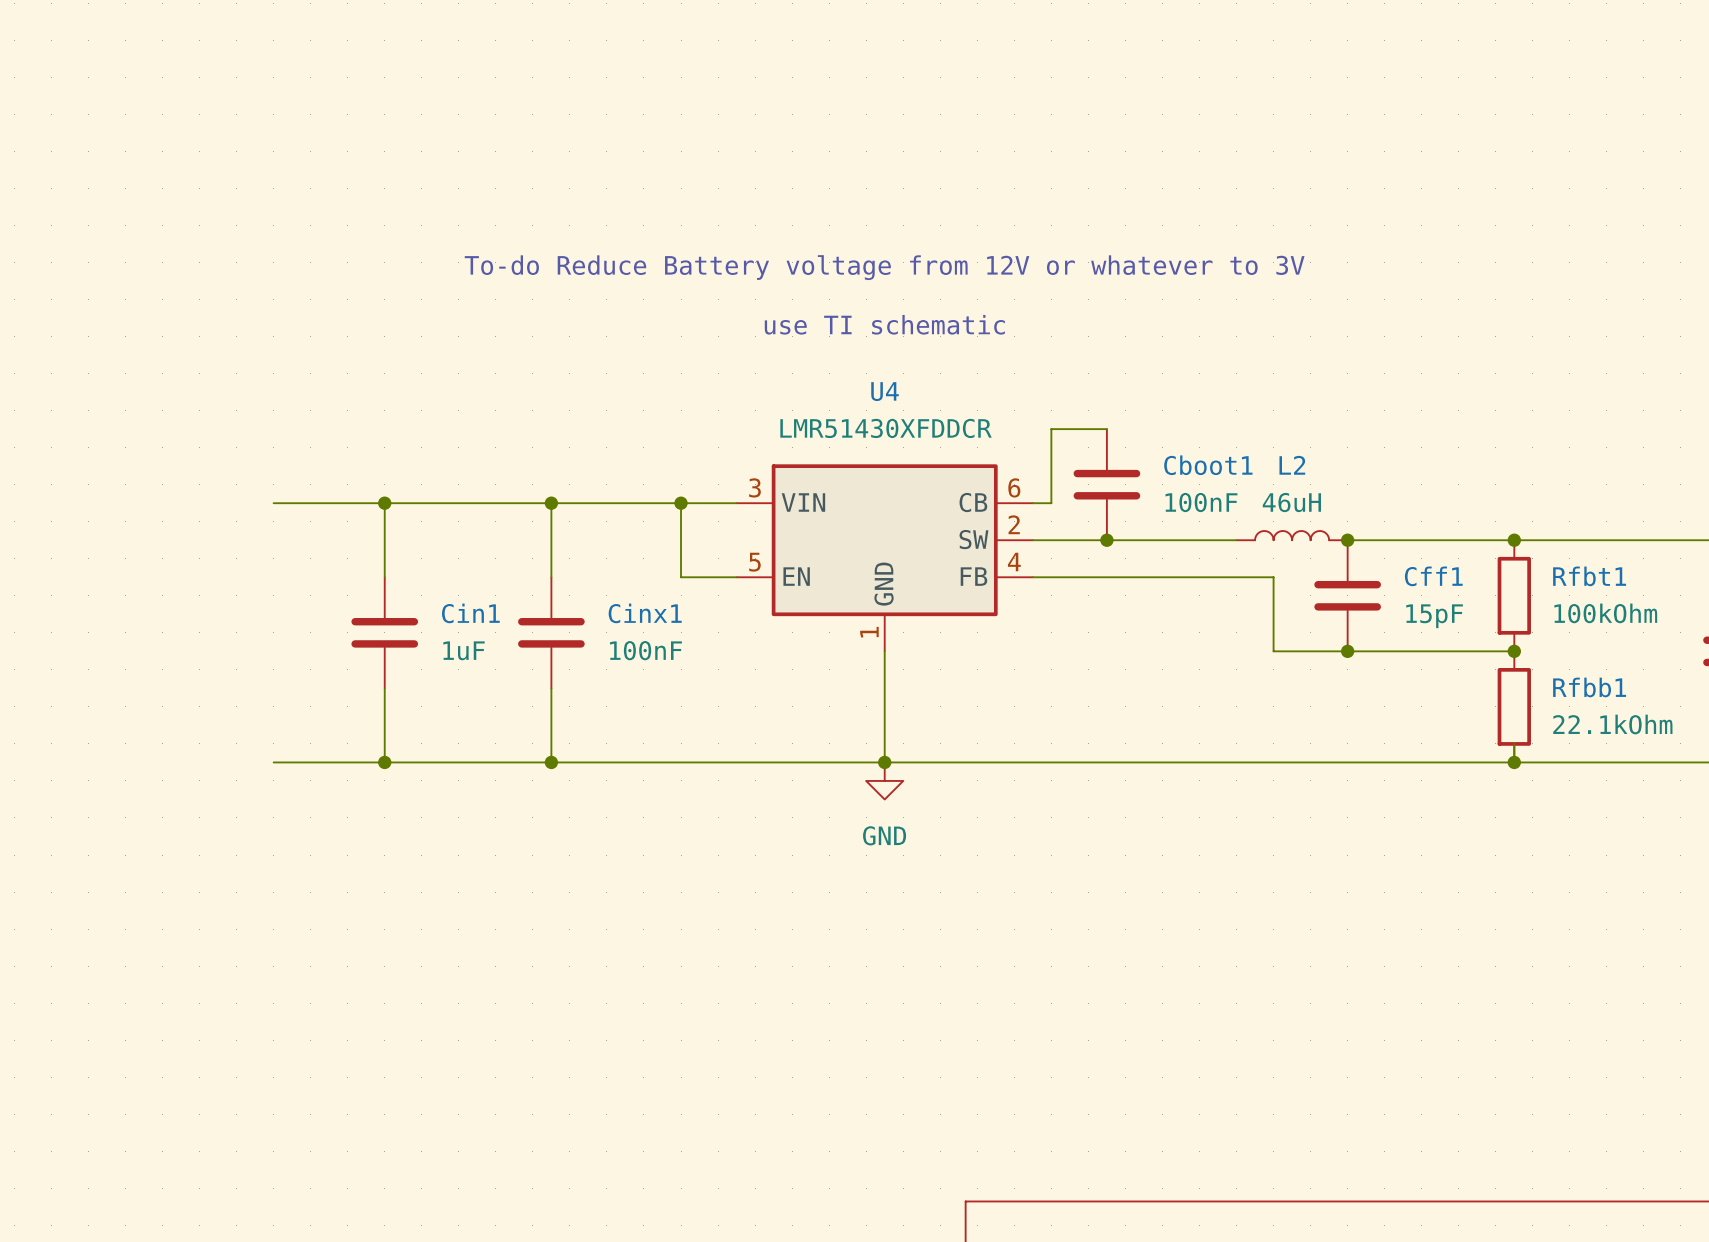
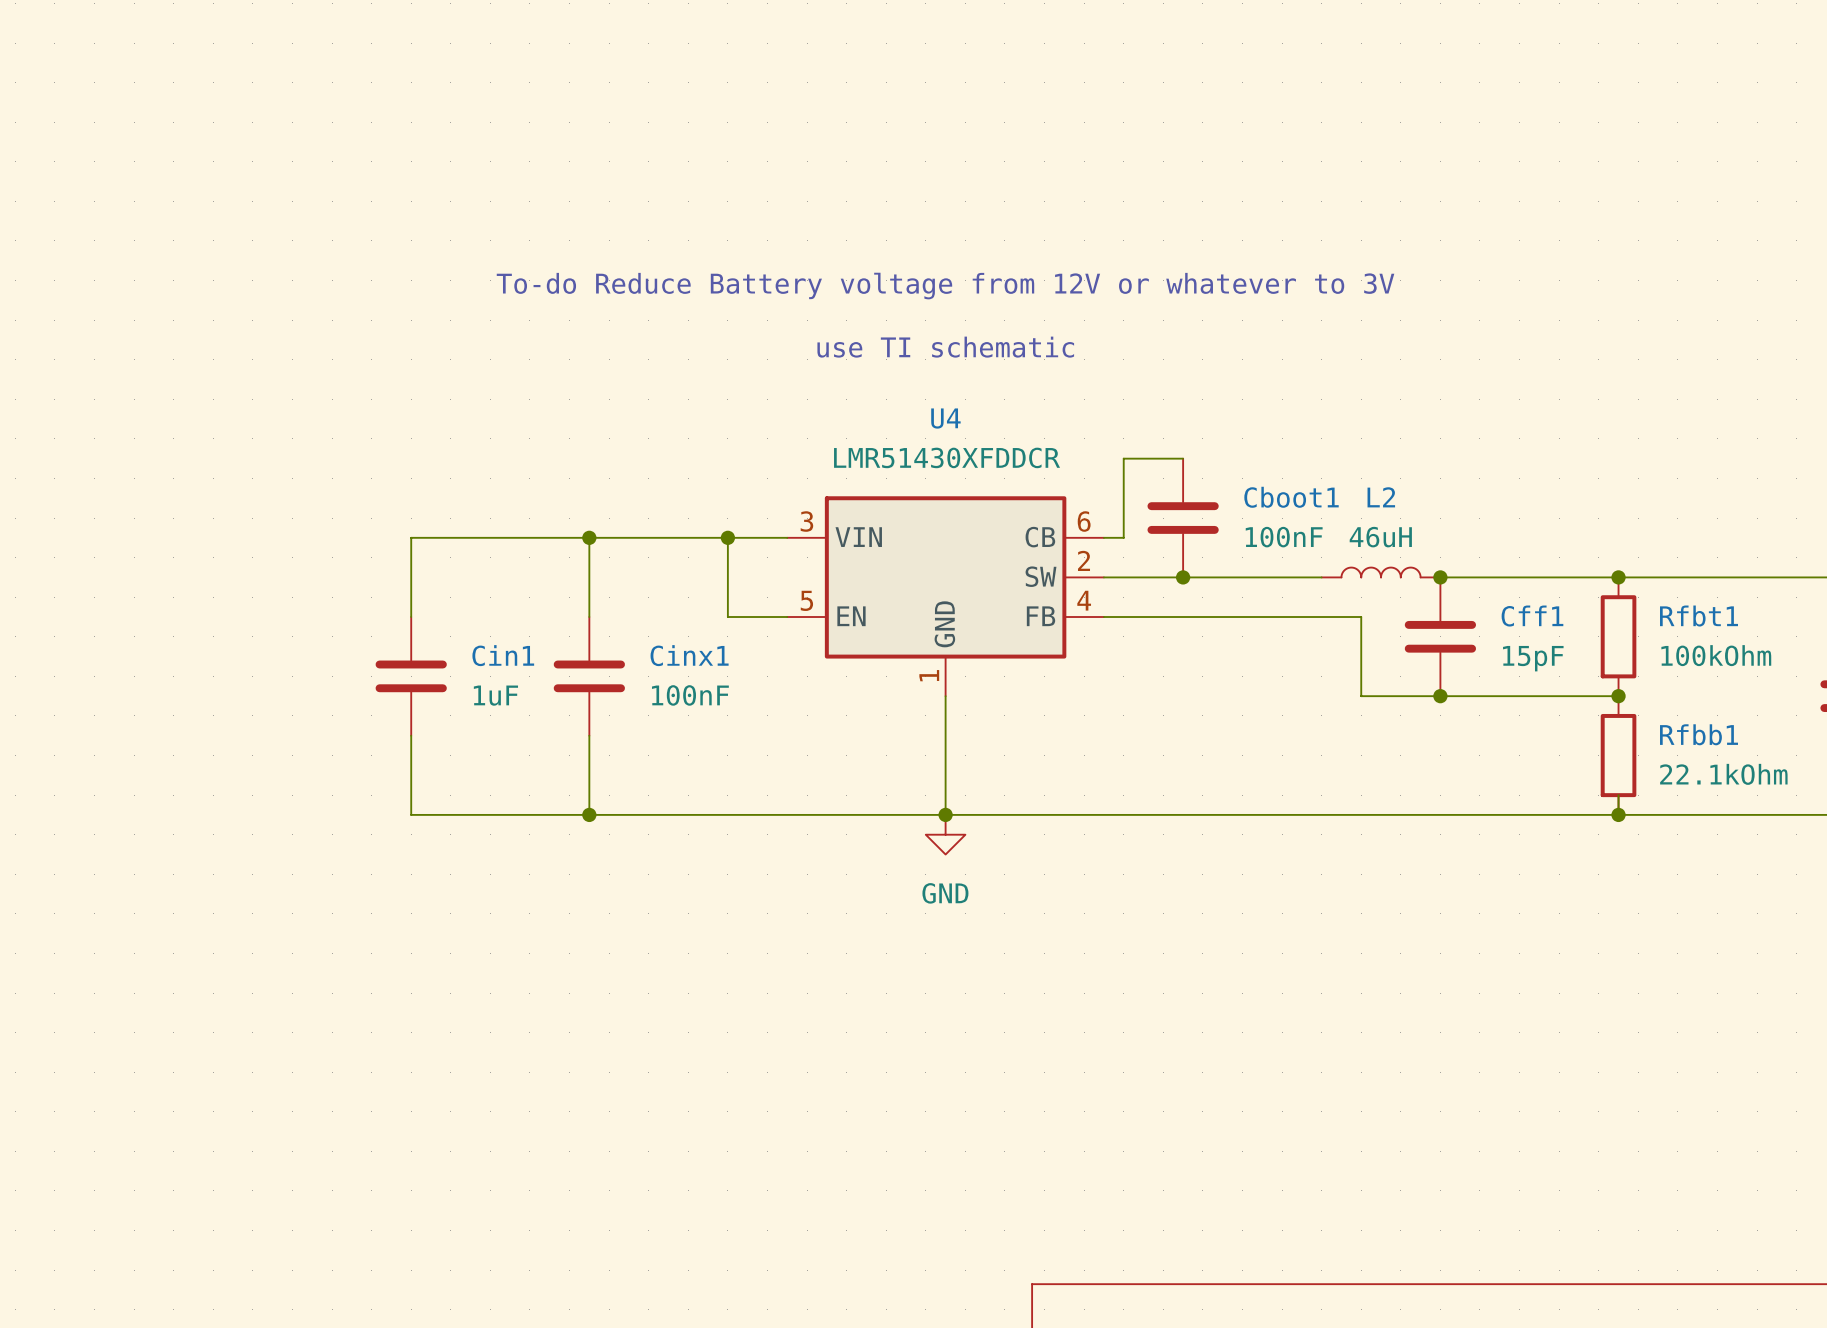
wire: (273, 503) (384, 503) -> none
junction: (384, 503) -> none
wire: (273, 762) (384, 762) -> none
junction: (384, 762) -> none

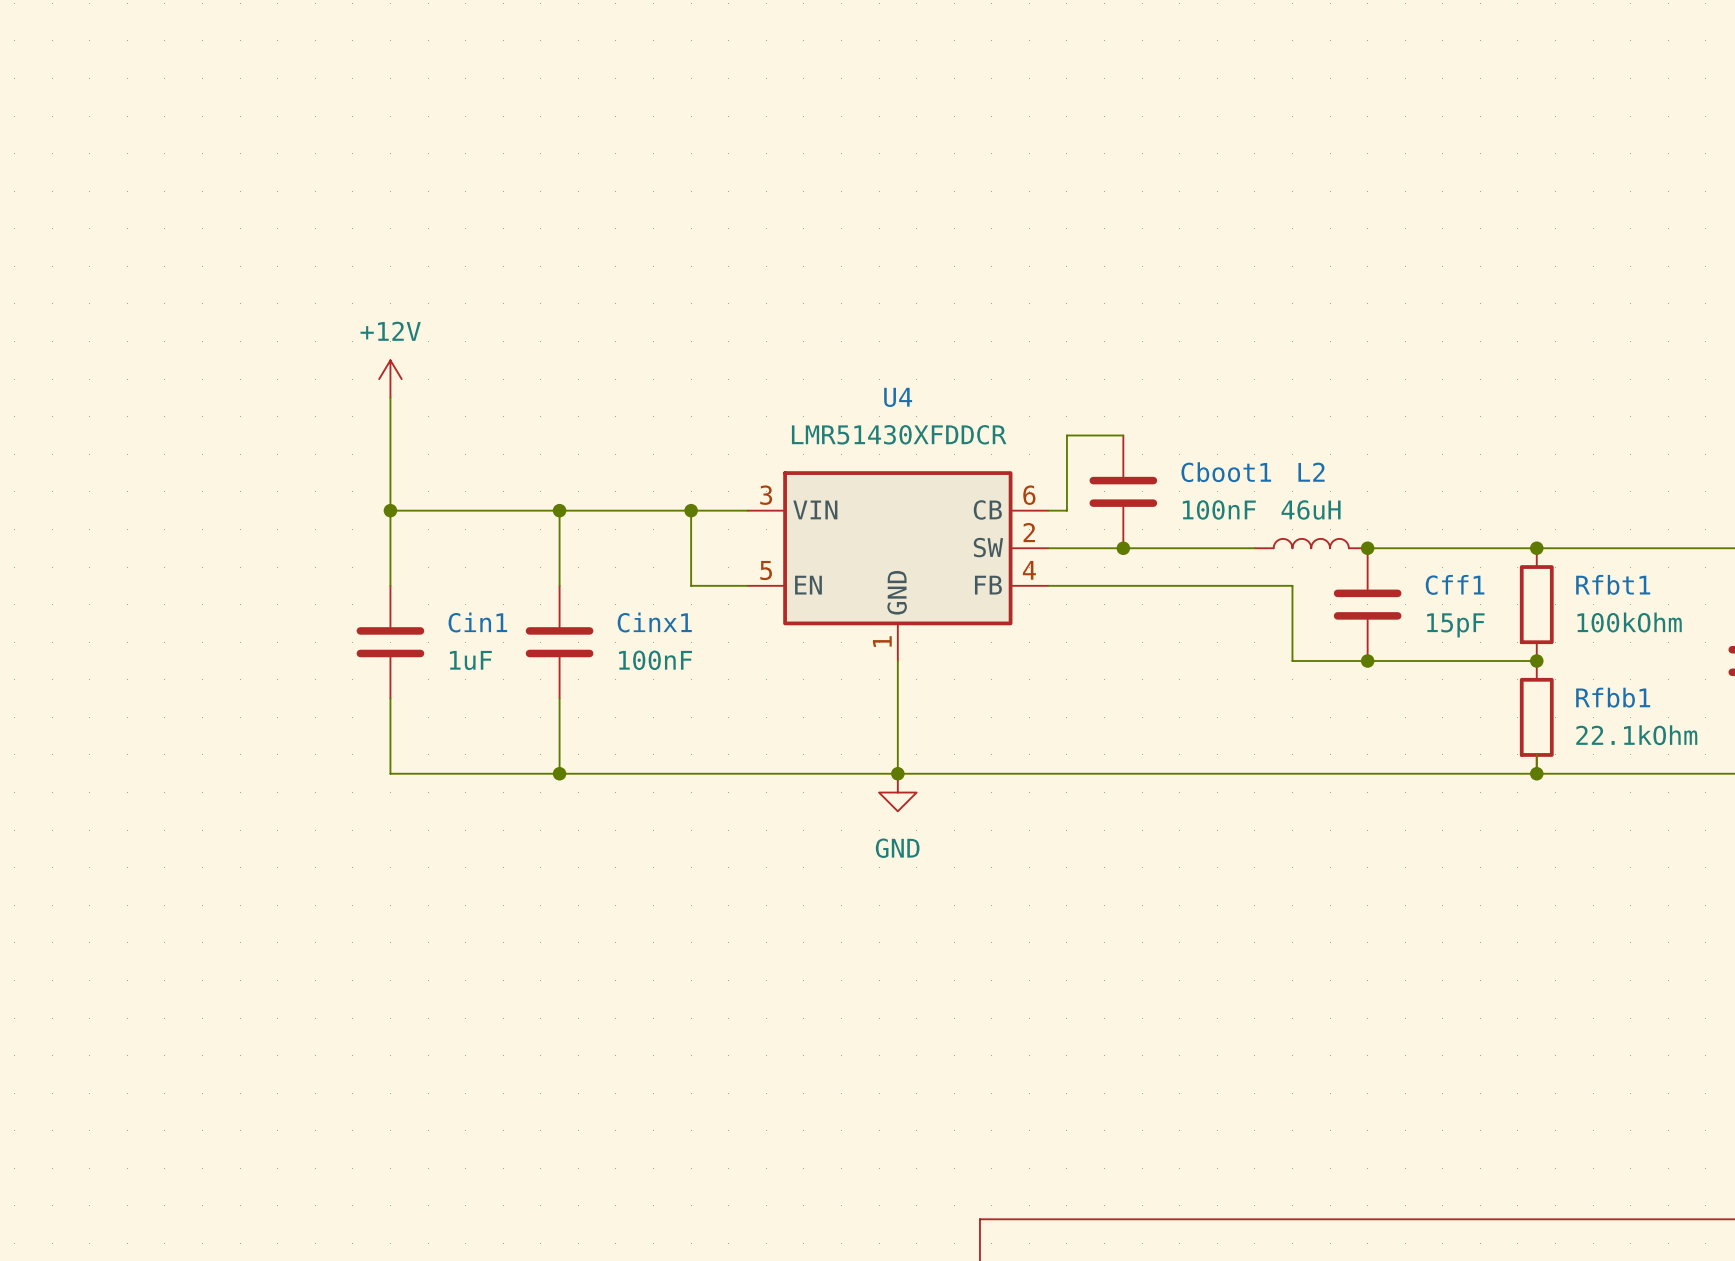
text: To-do Reduce Battery voltage from 12V or whatever to 3V (945, 286) -> none
text: use TI schematic (945, 347) -> none
power symbol: none -> +12V (390, 379)
wire: none -> (390, 397) (390, 510)
junction: none -> (390, 510)

